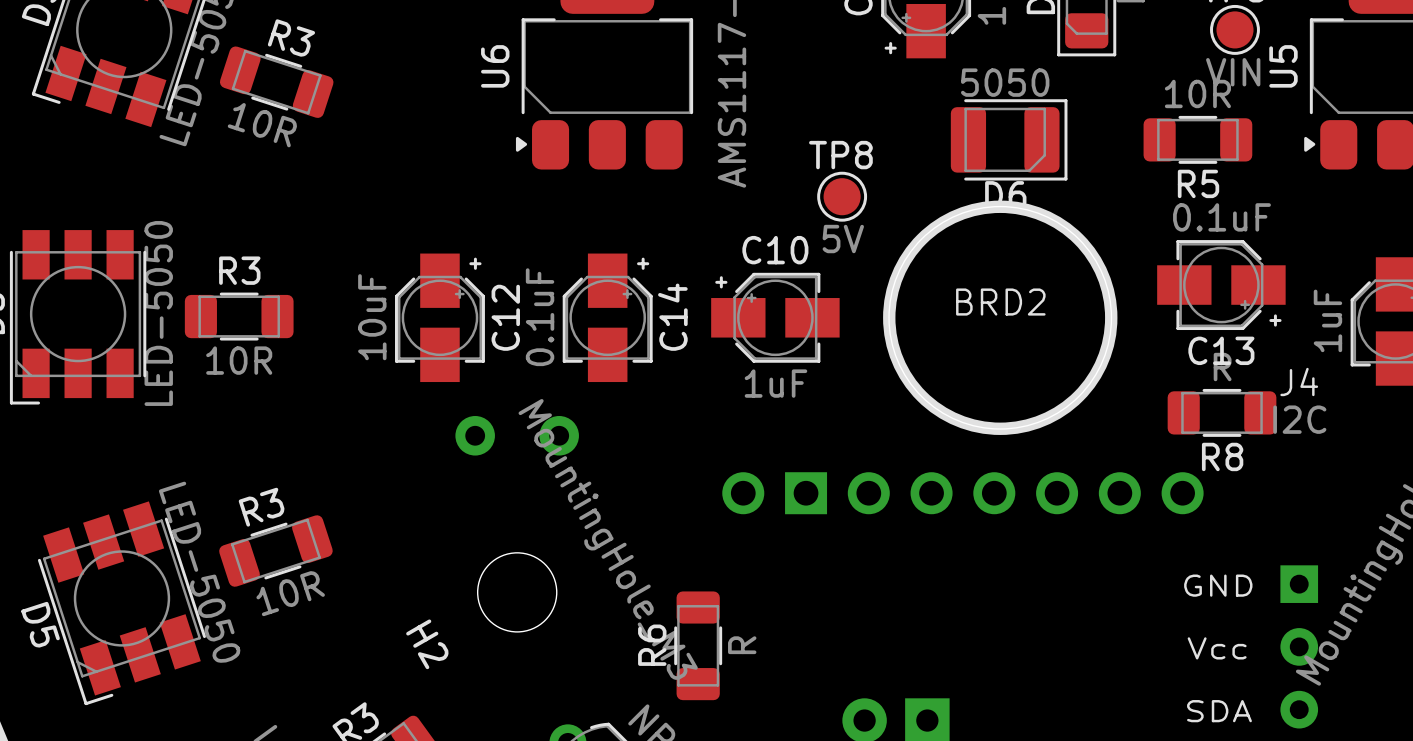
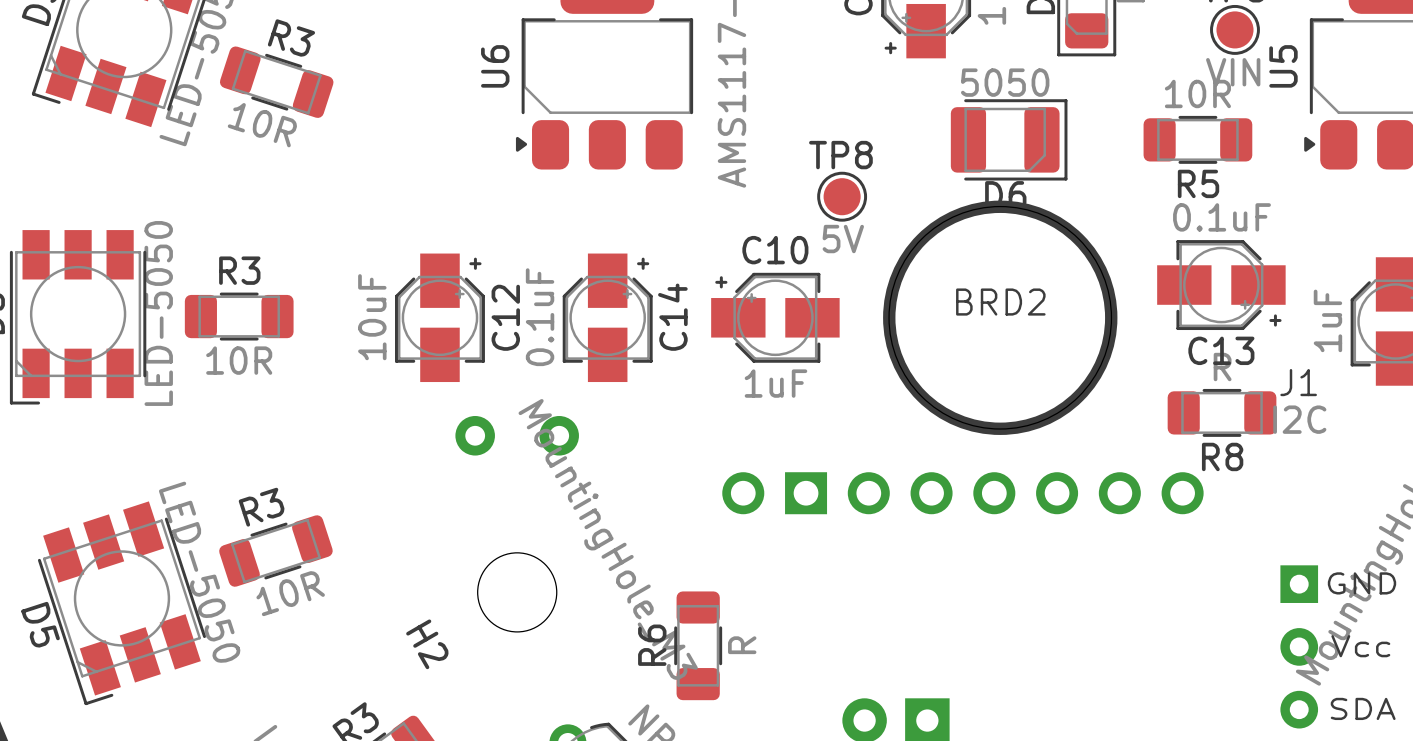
J4 name: J4 (1299, 382) -> J1 (1298, 382)
J4 text position: GND (1218, 585) -> GND (1361, 583)
J4 text position: Vcc (1217, 648) -> Vcc (1360, 646)
J4 text position: SDA (1219, 711) -> SDA (1363, 708)

